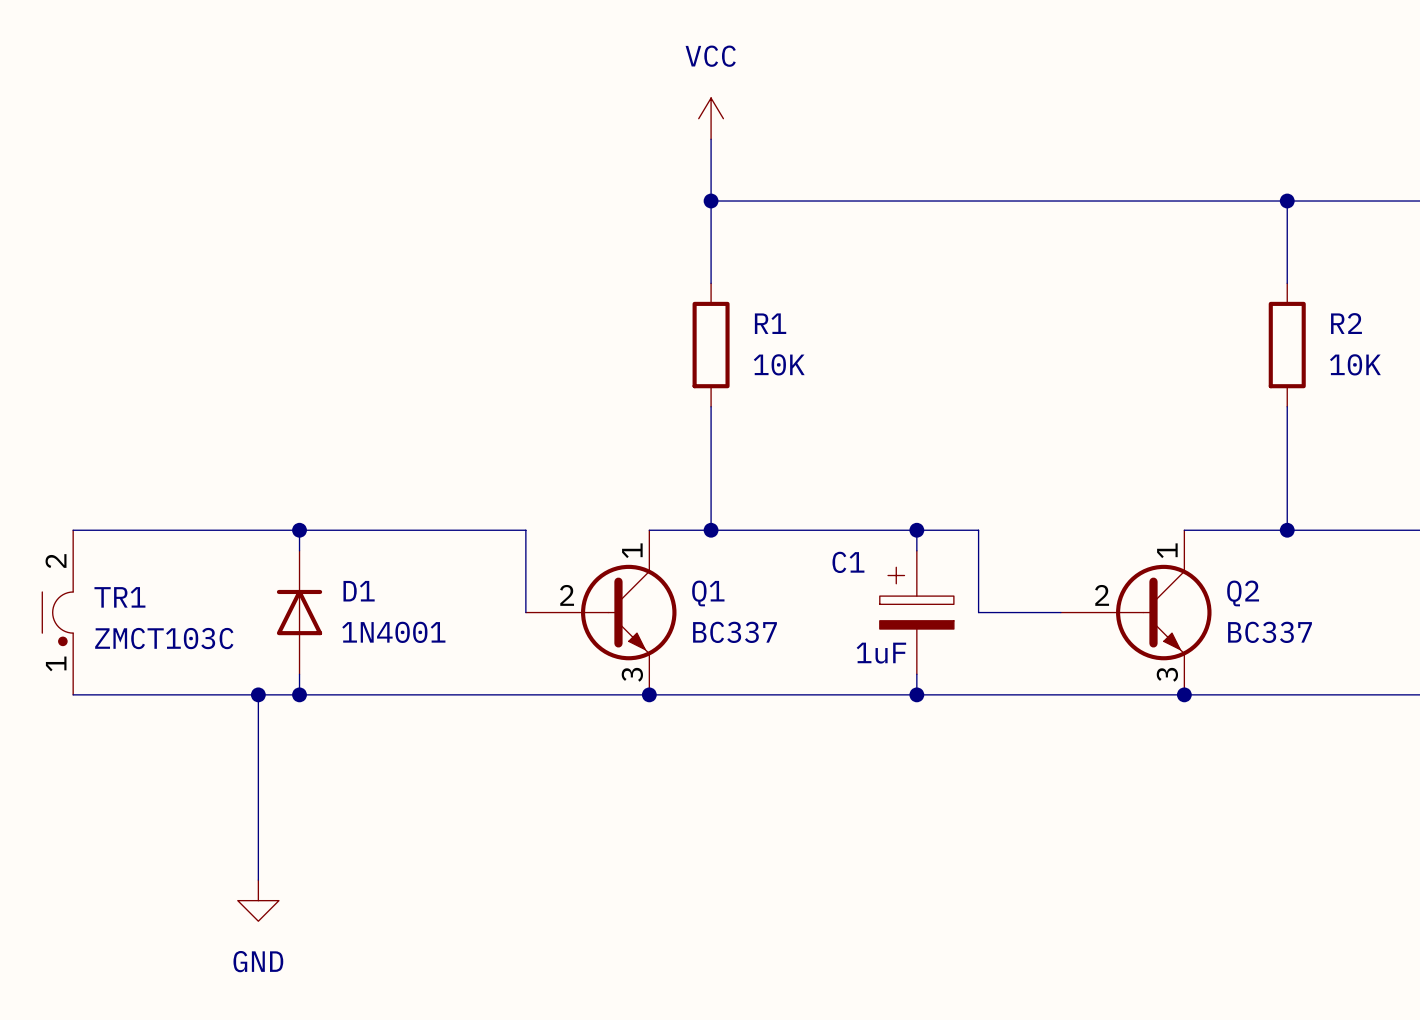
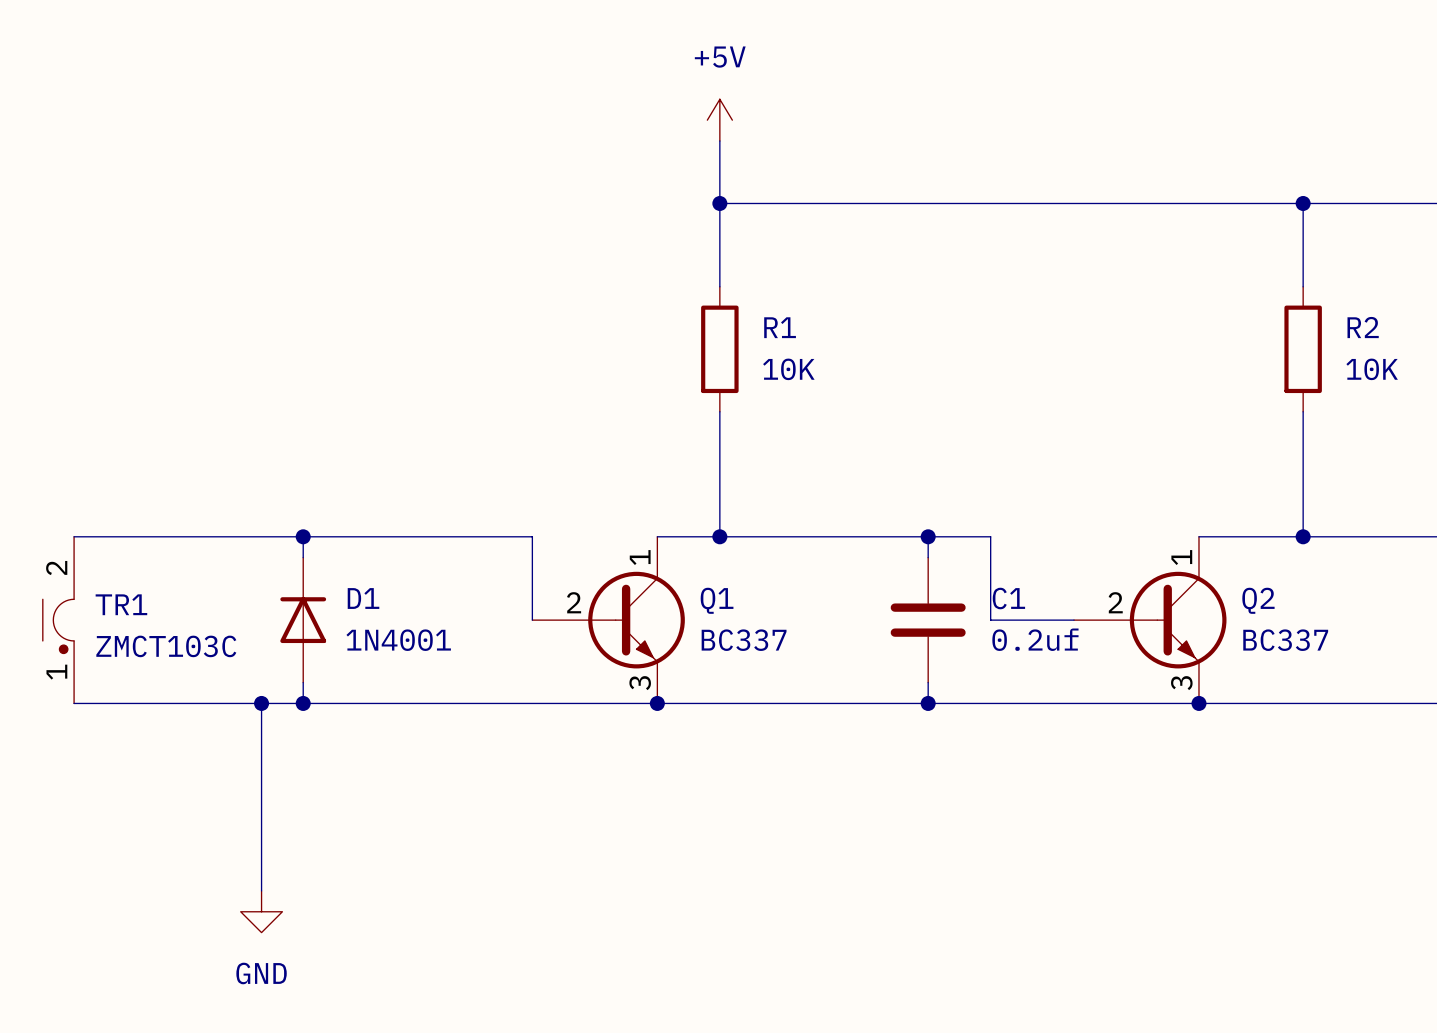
power symbol: VCC (711, 118) -> +5V (719, 120)
C1 symbol: [879, 550, 954, 675] -> [890, 557, 966, 683]
C1 name position: C1 (848, 562) -> C1 (1008, 598)
C1 value: 1uF (881, 653) -> 0.2uf (1035, 639)

